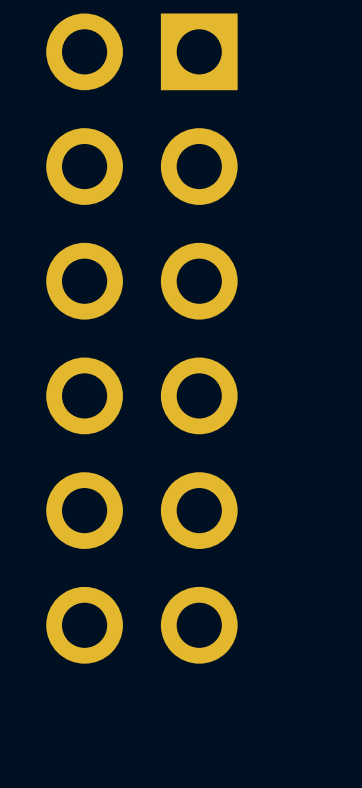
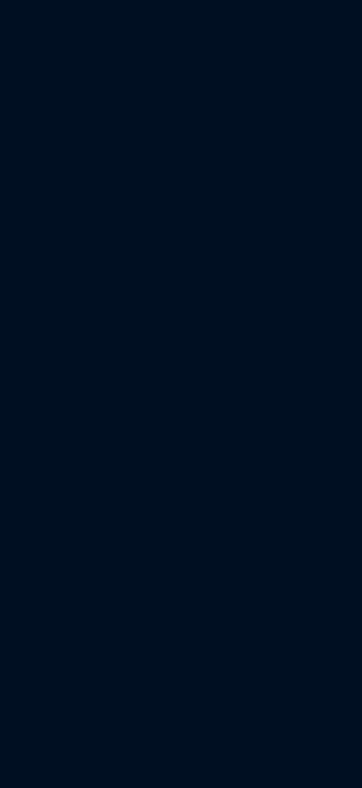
part: (141, 338) -> none

